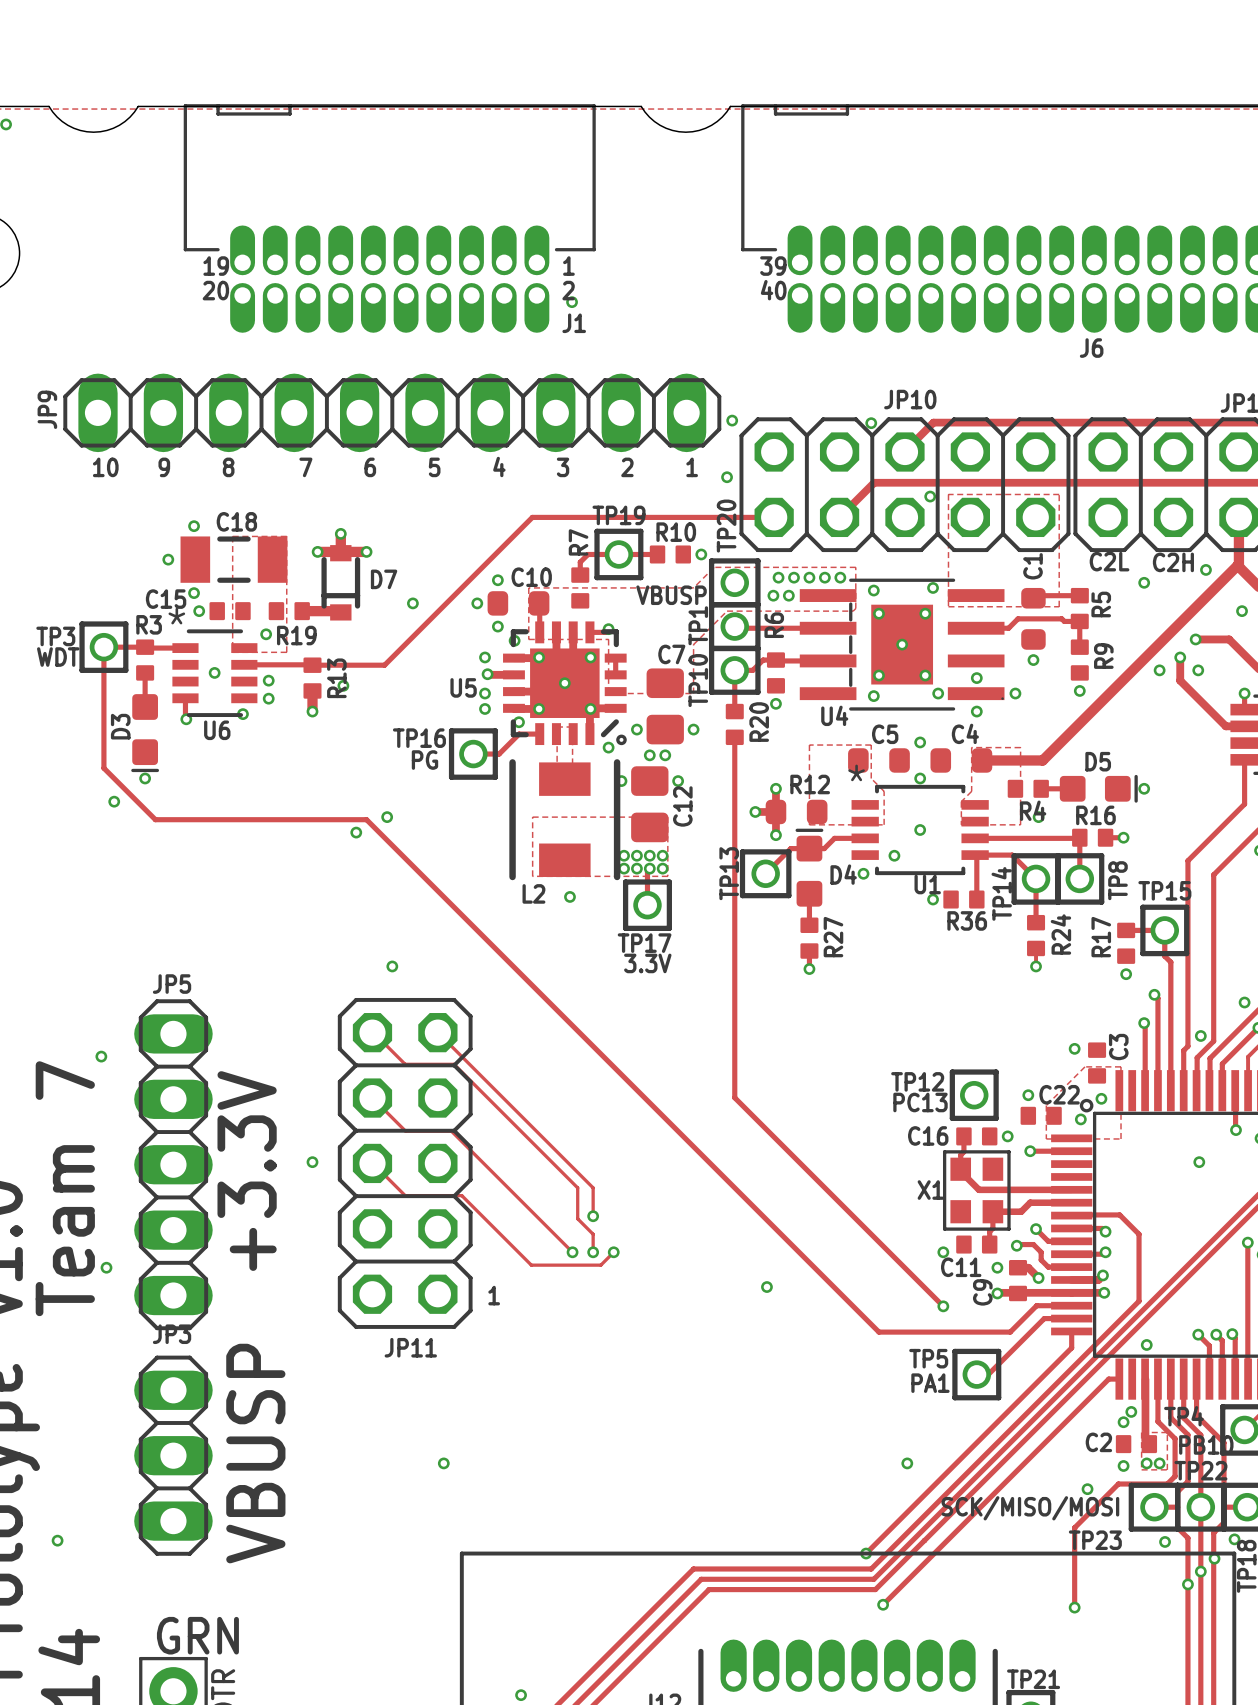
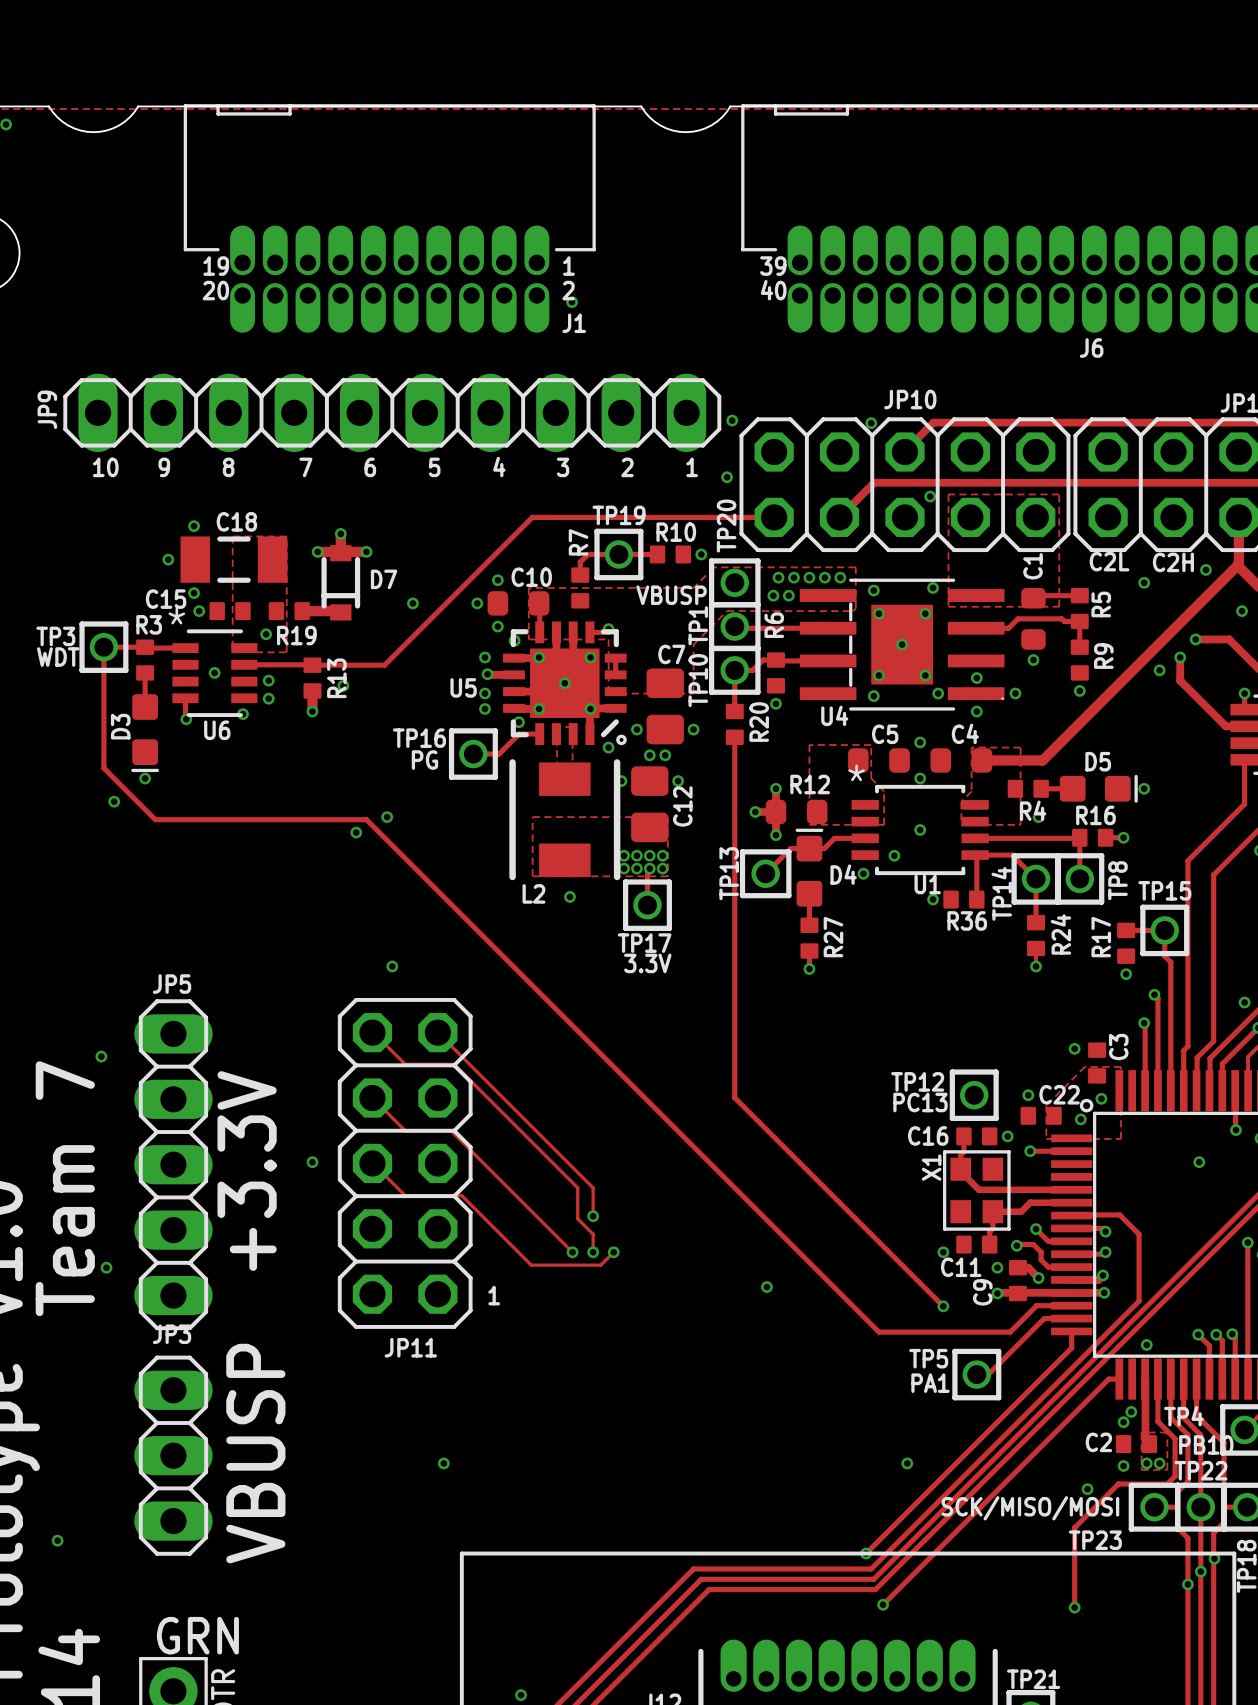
via: (1198, 670) -> none
via: (1200, 1035) -> none
X1 name rotation: 0° (930, 1190) -> 90° counterclockwise (931, 1167)
via: (1234, 1539) -> none
via: (1165, 1541) -> none

